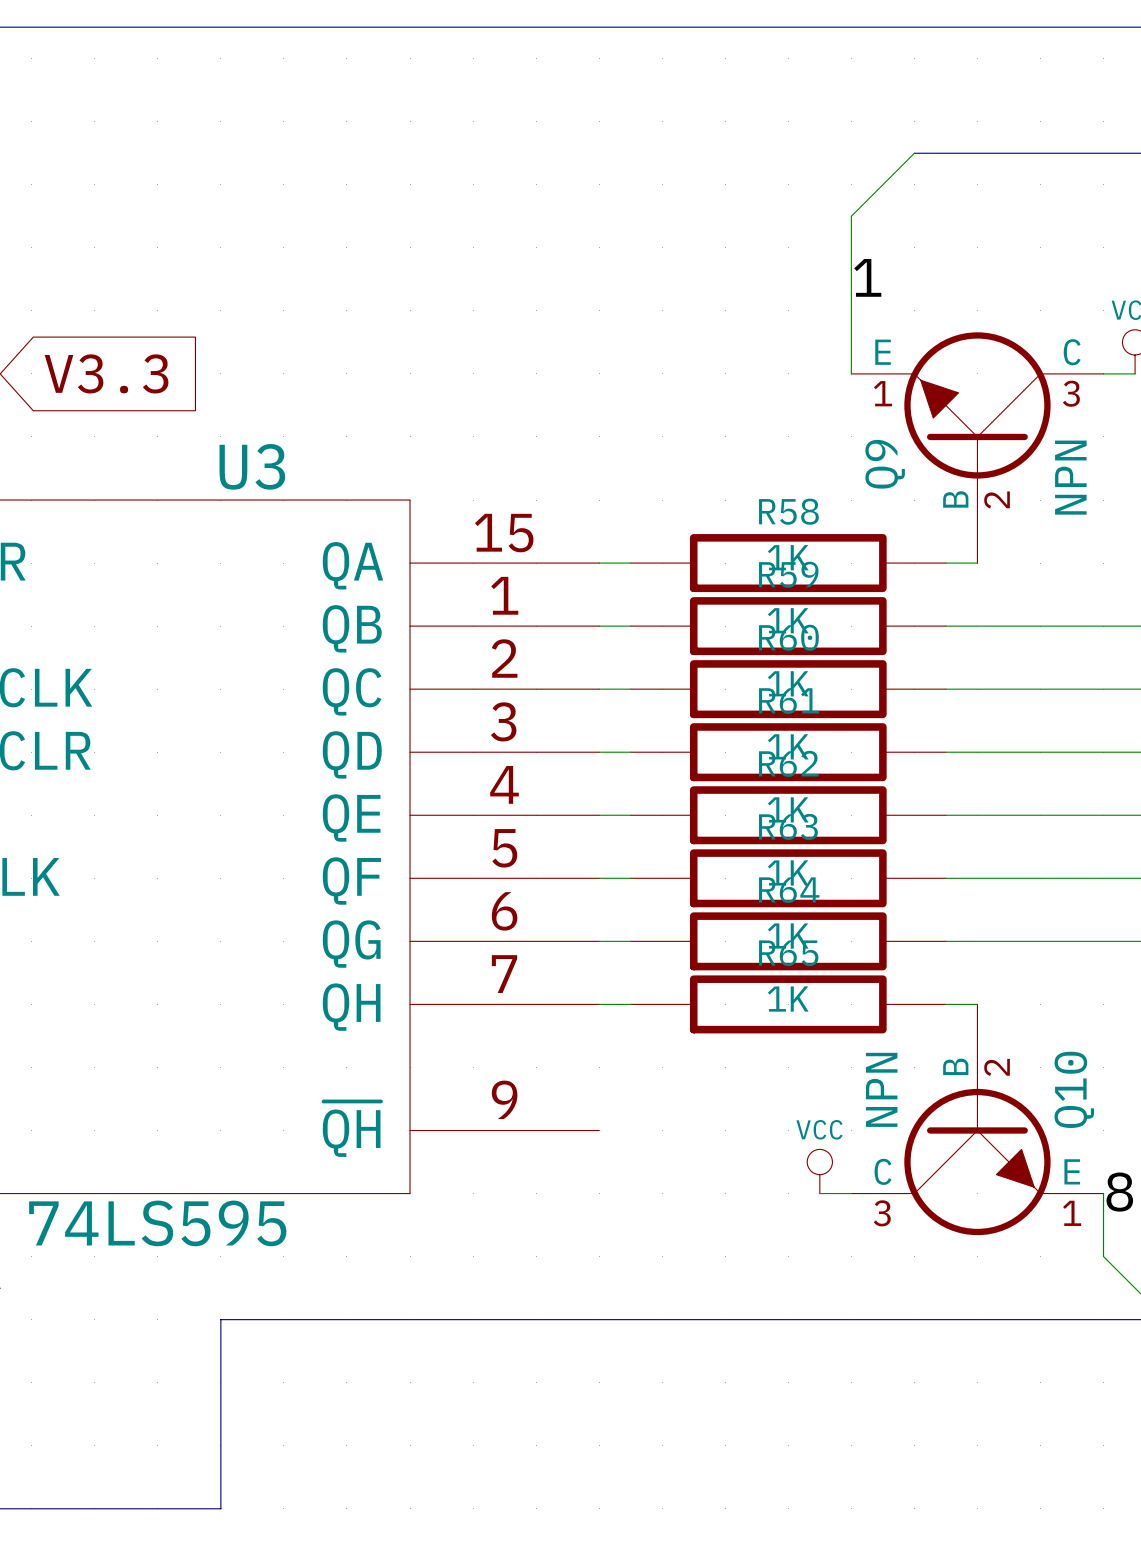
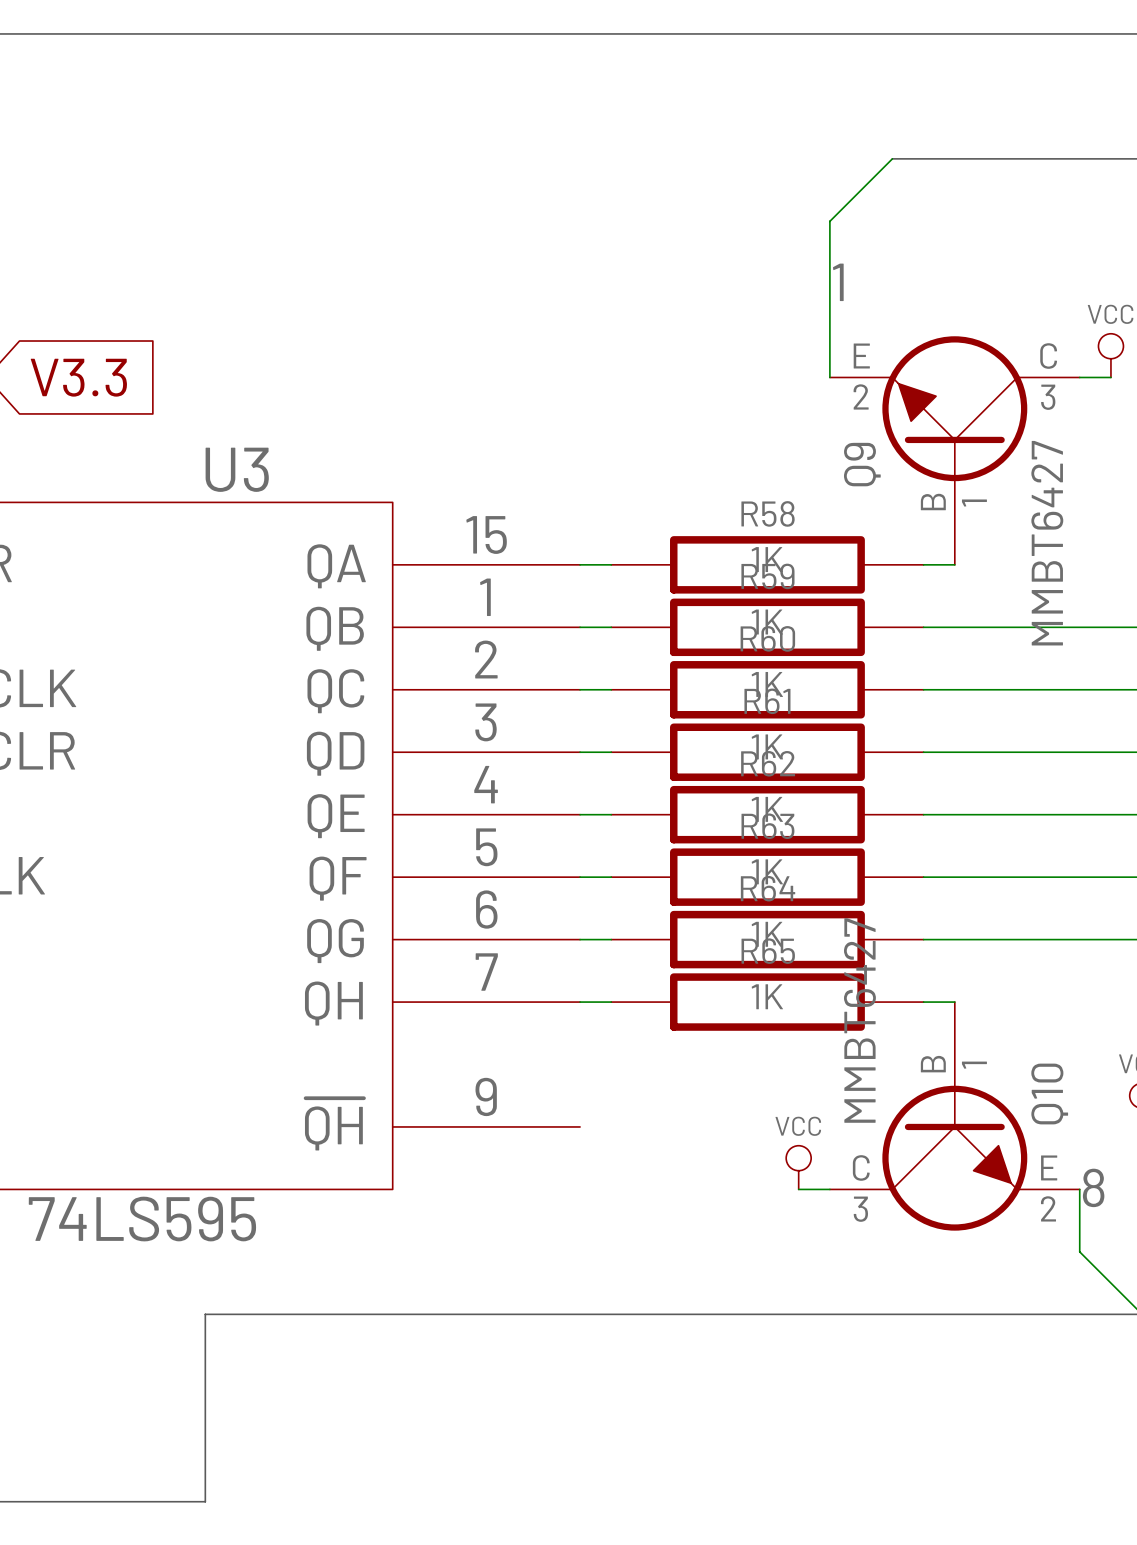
Q9 pin number: 1 (882, 393) -> 2 (861, 396)
Q9 value: NPN (1070, 477) -> MMBT6427 (1047, 543)
Q9 pin number: 2 (997, 499) -> 1 (974, 503)
Q10 pin number: 2 (997, 1067) -> 1 (974, 1065)
Q10 value: NPN (881, 1089) -> MMBT6427 (859, 1020)
Q10 pin number: 1 (1072, 1213) -> 2 (1048, 1208)

